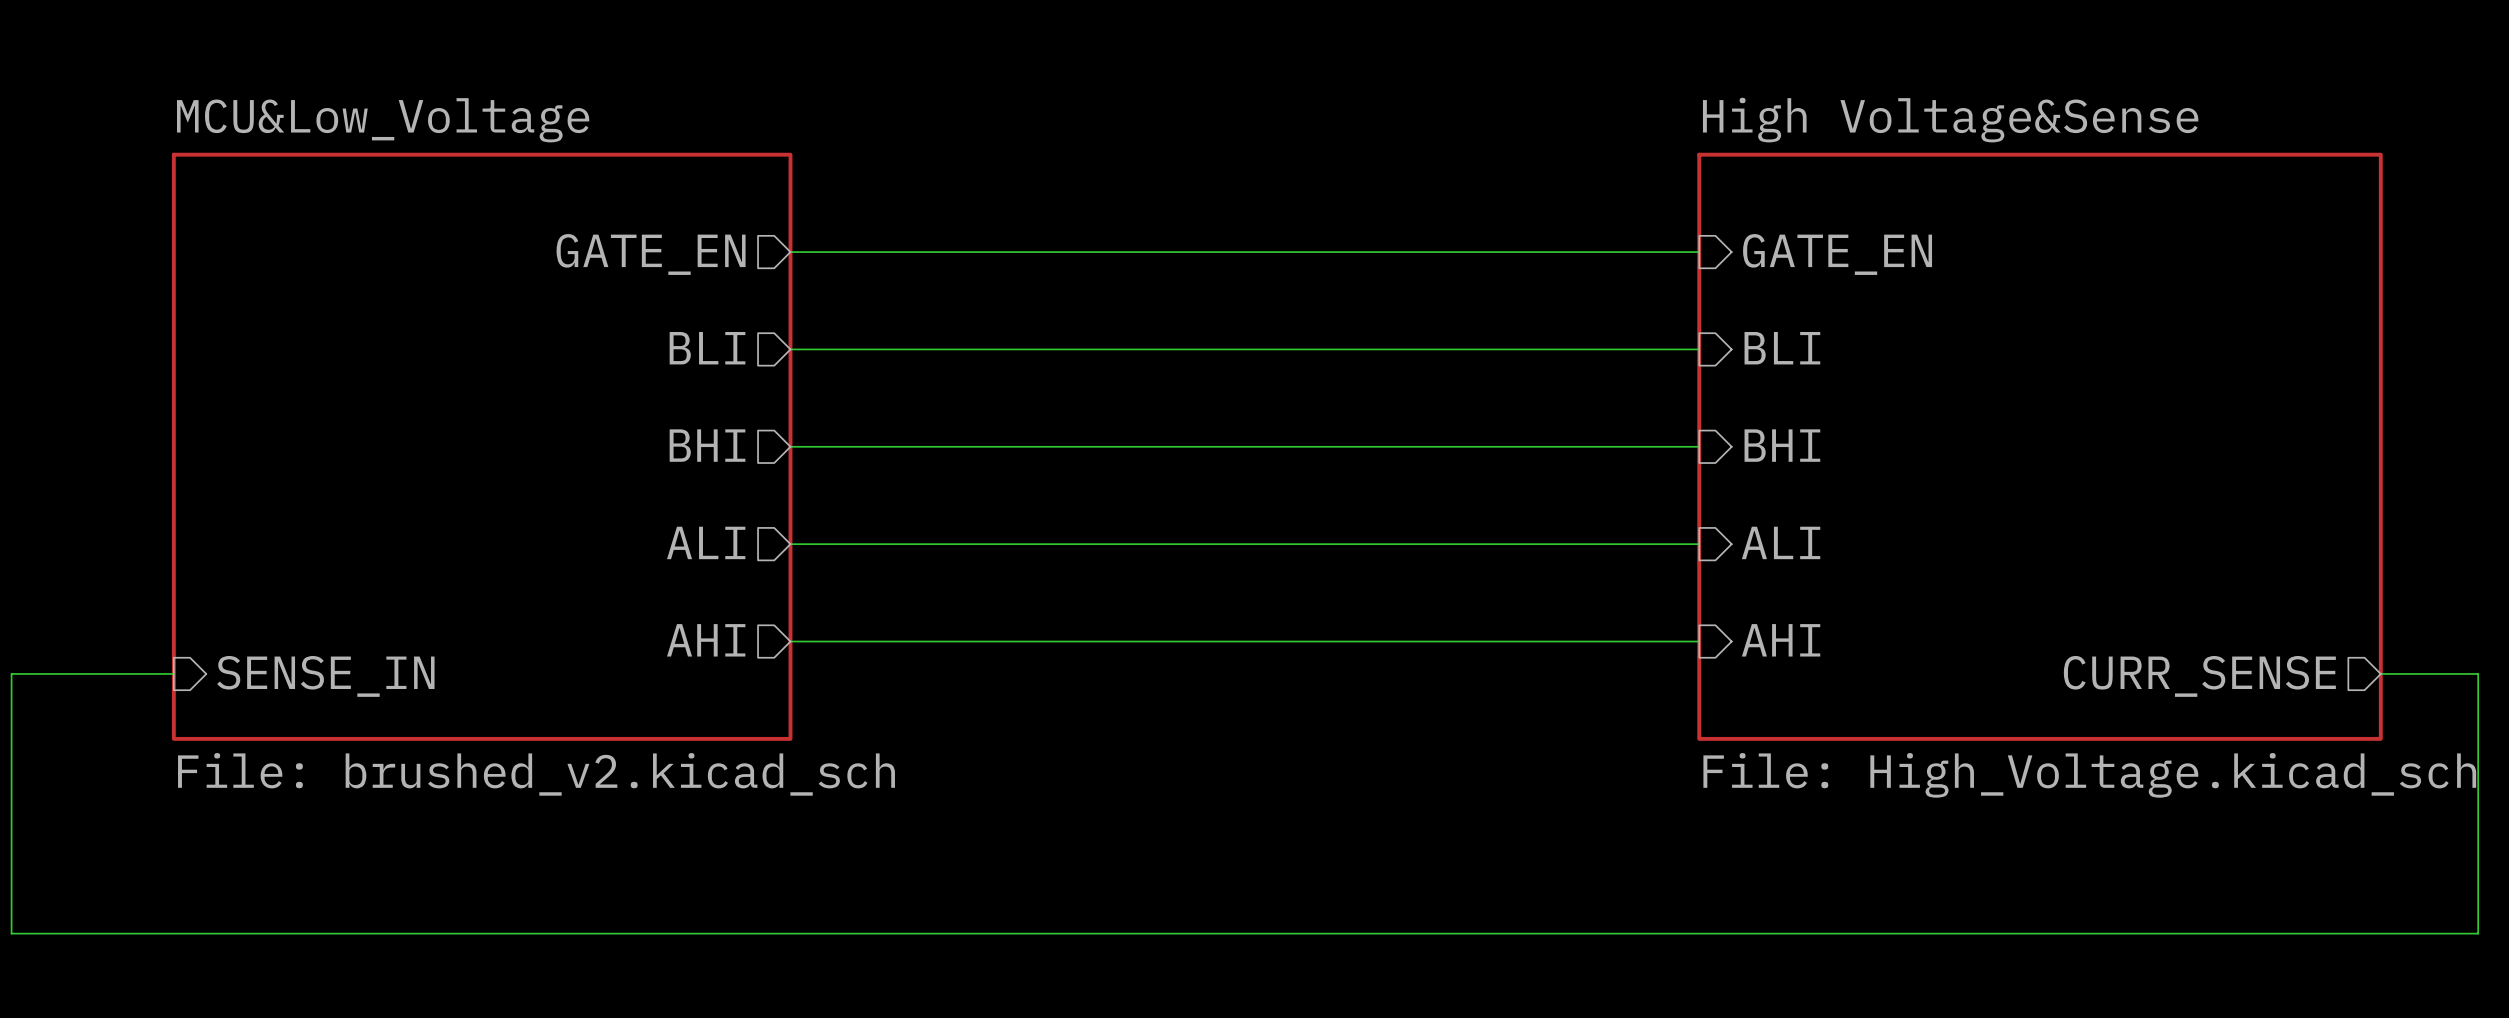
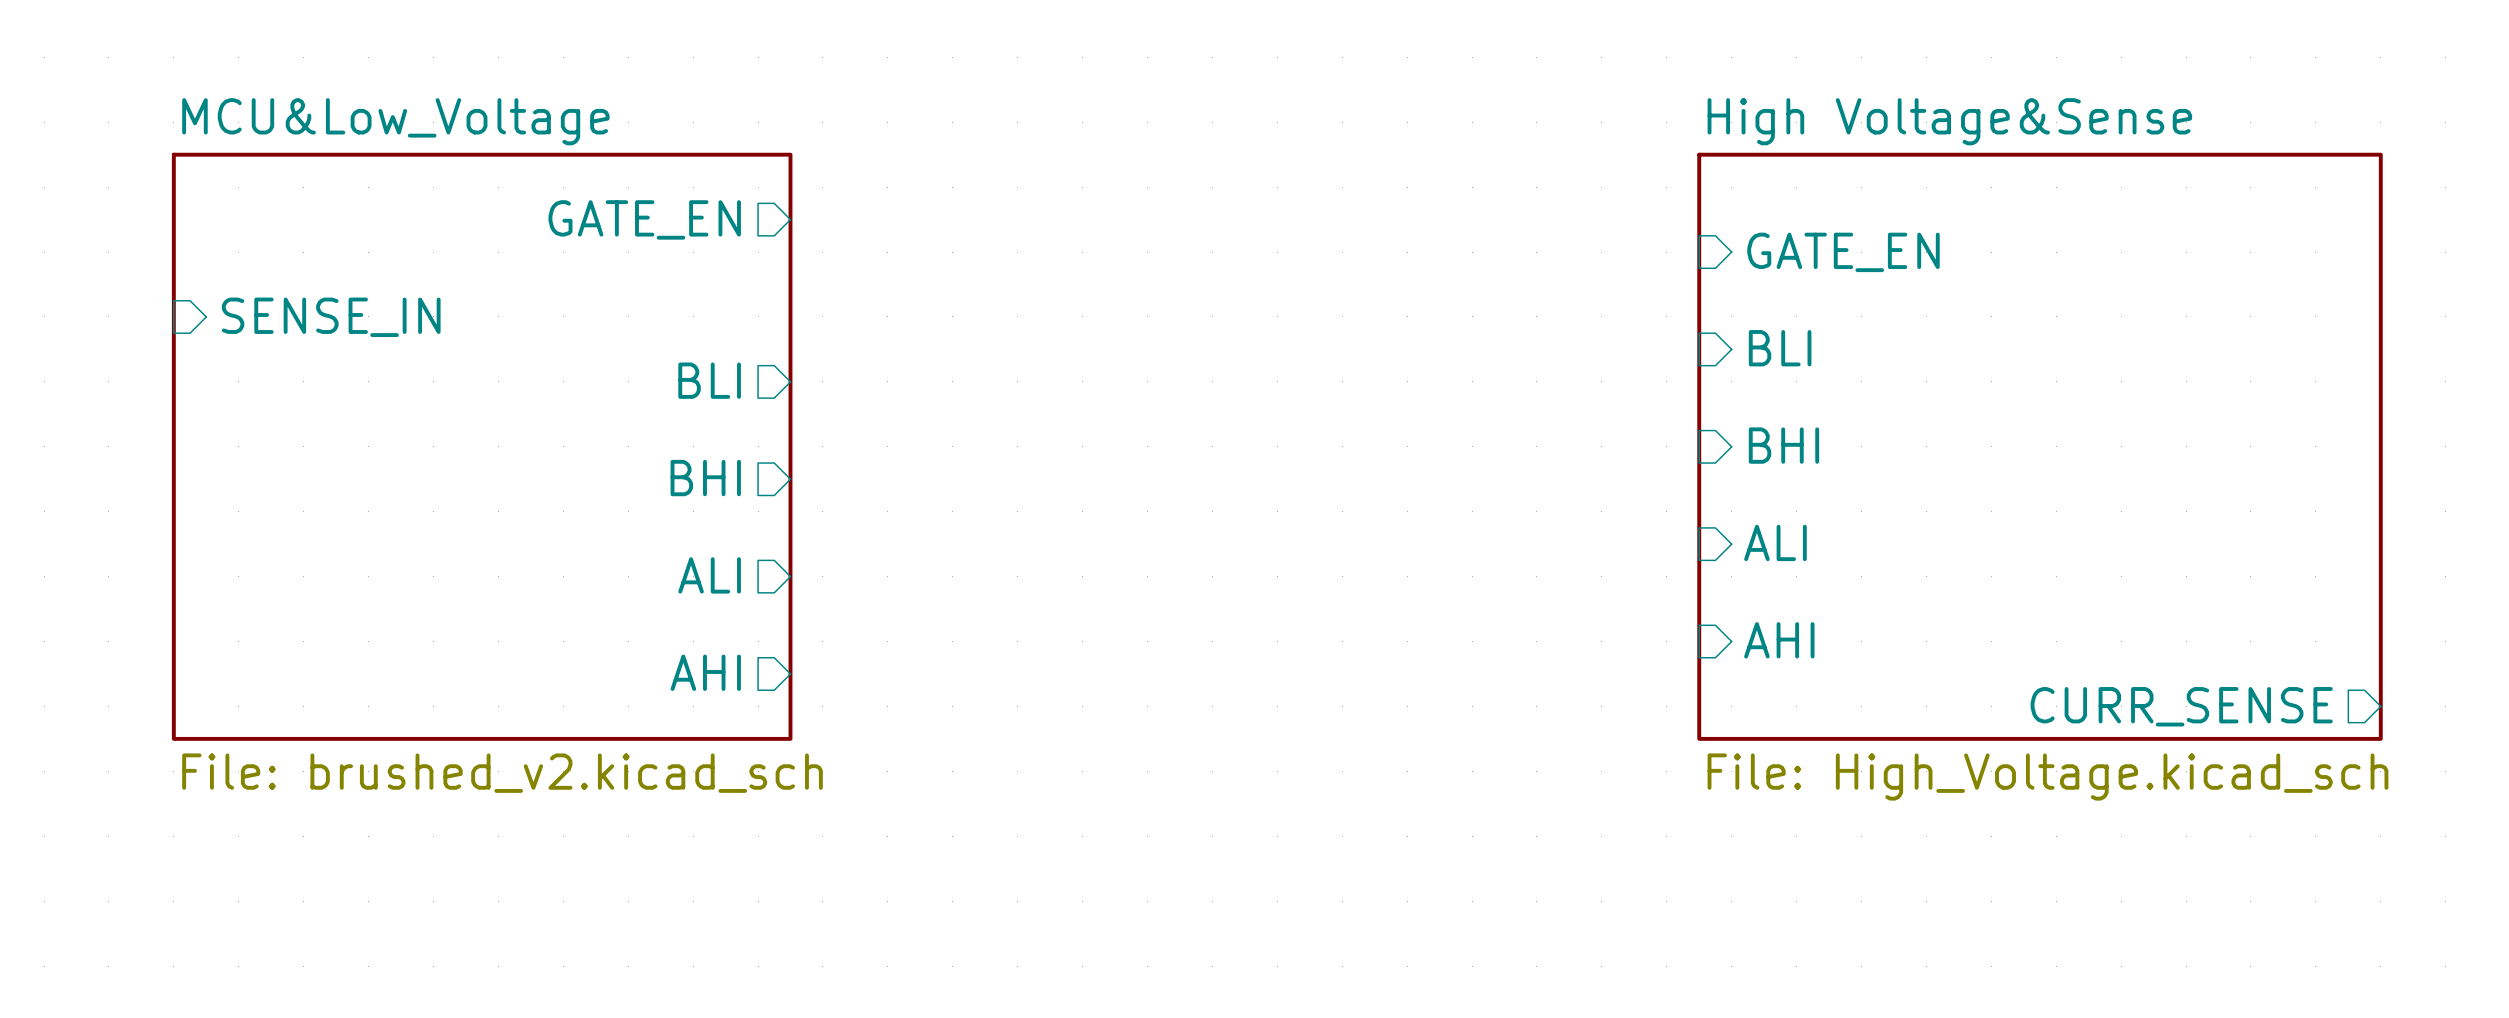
wire: (790, 252) (1699, 252) -> none
sheet pin position: GATE_EN (651, 254) -> GATE_EN (644, 219)
sheet pin position: BLI (707, 348) -> BLI (709, 380)
wire: (790, 349) (1699, 349) -> none
sheet pin position: BHI (707, 445) -> BHI (705, 478)
wire: (790, 446) (1699, 446) -> none
sheet pin position: ALI (706, 542) -> ALI (709, 575)
wire: (790, 544) (1699, 544) -> none
sheet pin position: AHI (706, 640) -> AHI (705, 672)
wire: (790, 641) (1699, 641) -> none
wire: (173, 673) (11, 673) (11, 933) (2478, 933) (2478, 673) (2380, 673) -> none
sheet pin position: SENSE_IN (325, 676) -> SENSE_IN (331, 317)
sheet pin position: CURR_SENSE (2199, 676) -> CURR_SENSE (2181, 706)

